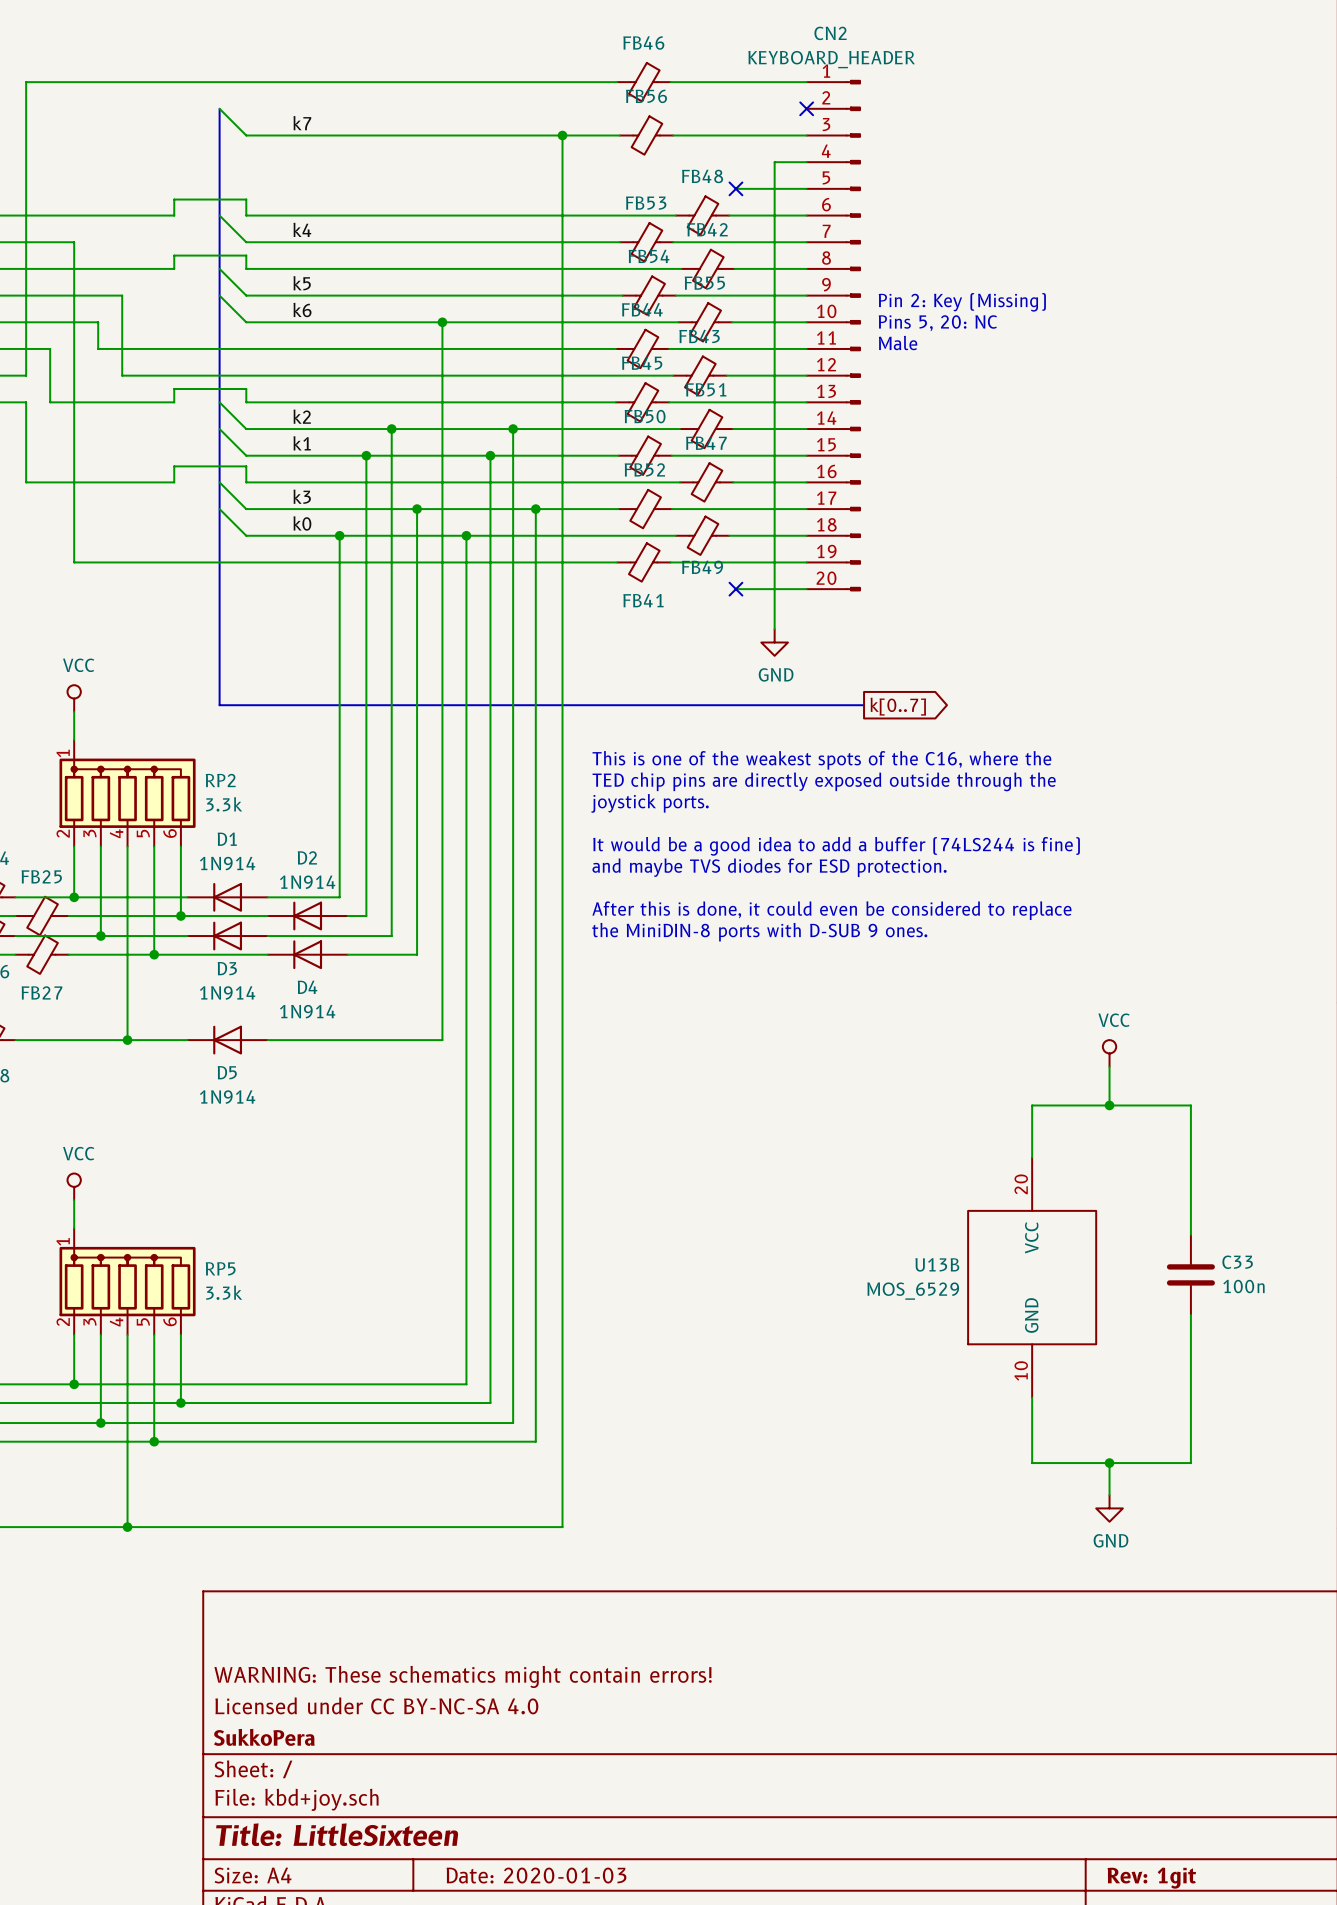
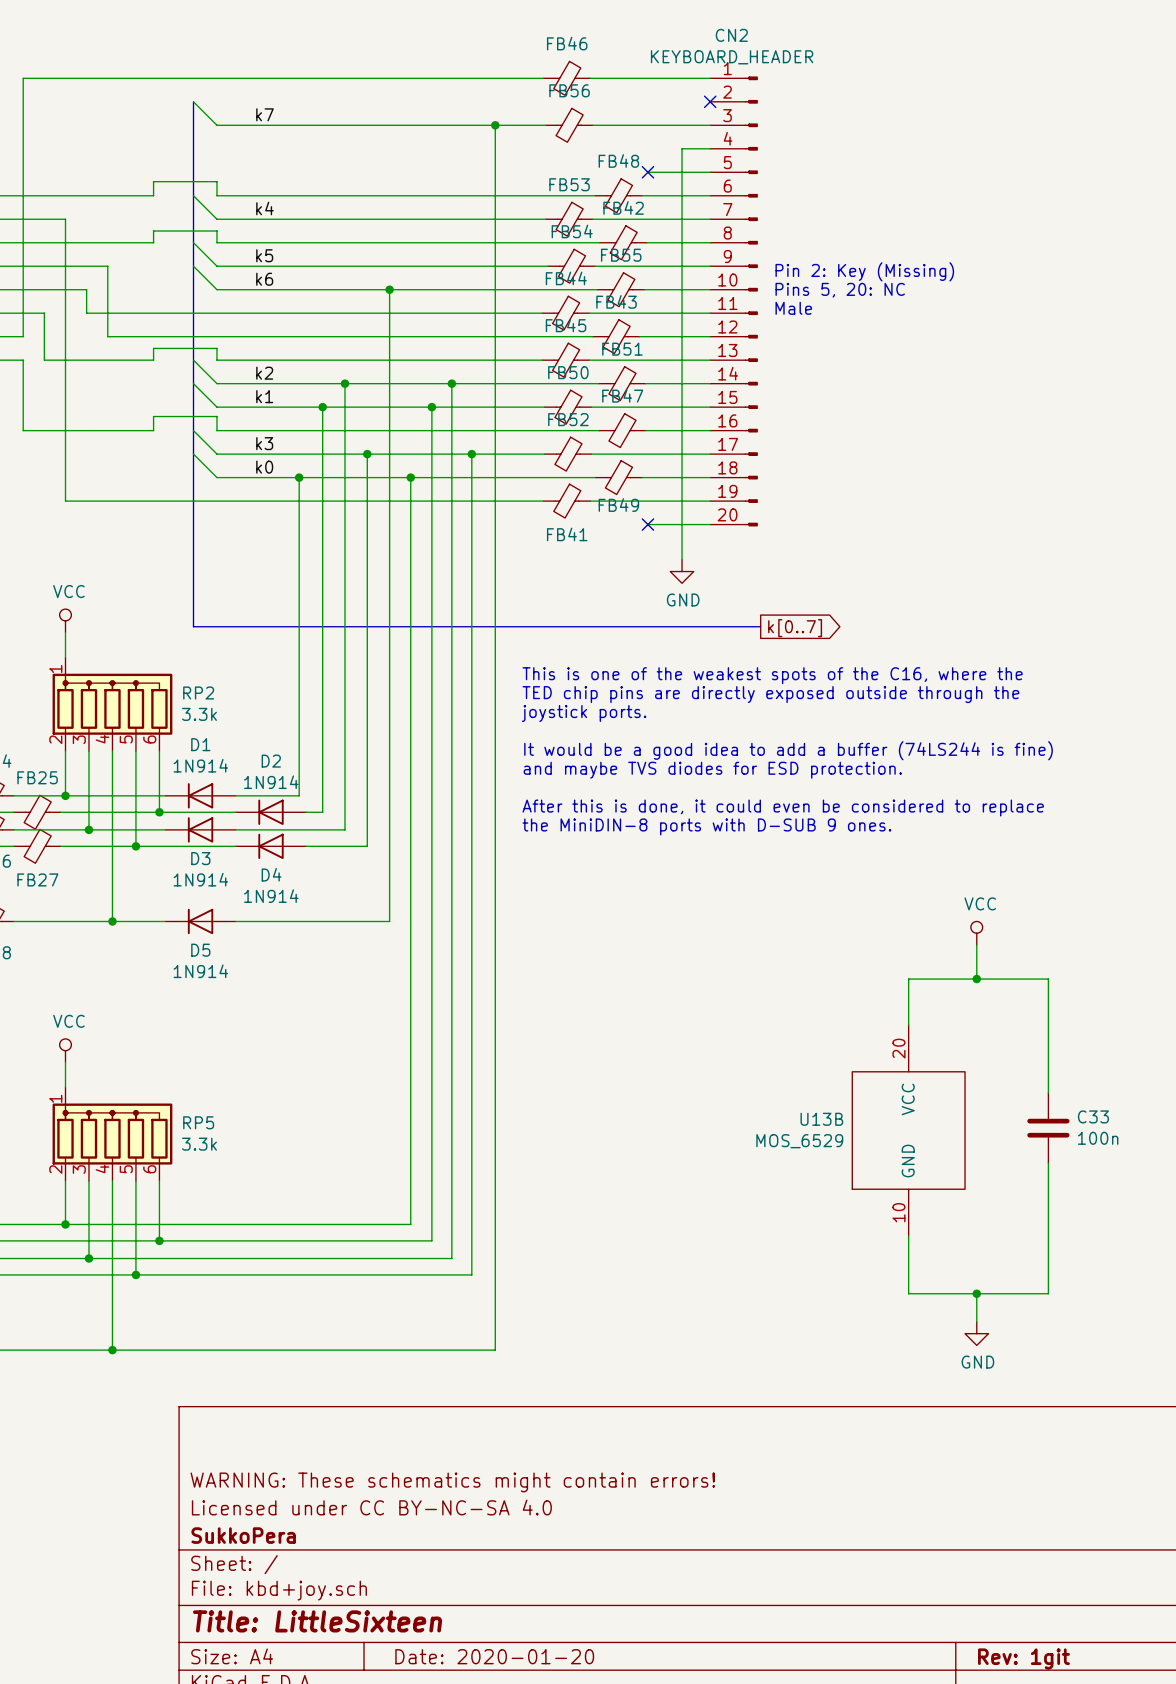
title block: Date: 2020-01-03 (536, 1875) -> Date: 2020-01-20 (494, 1656)

